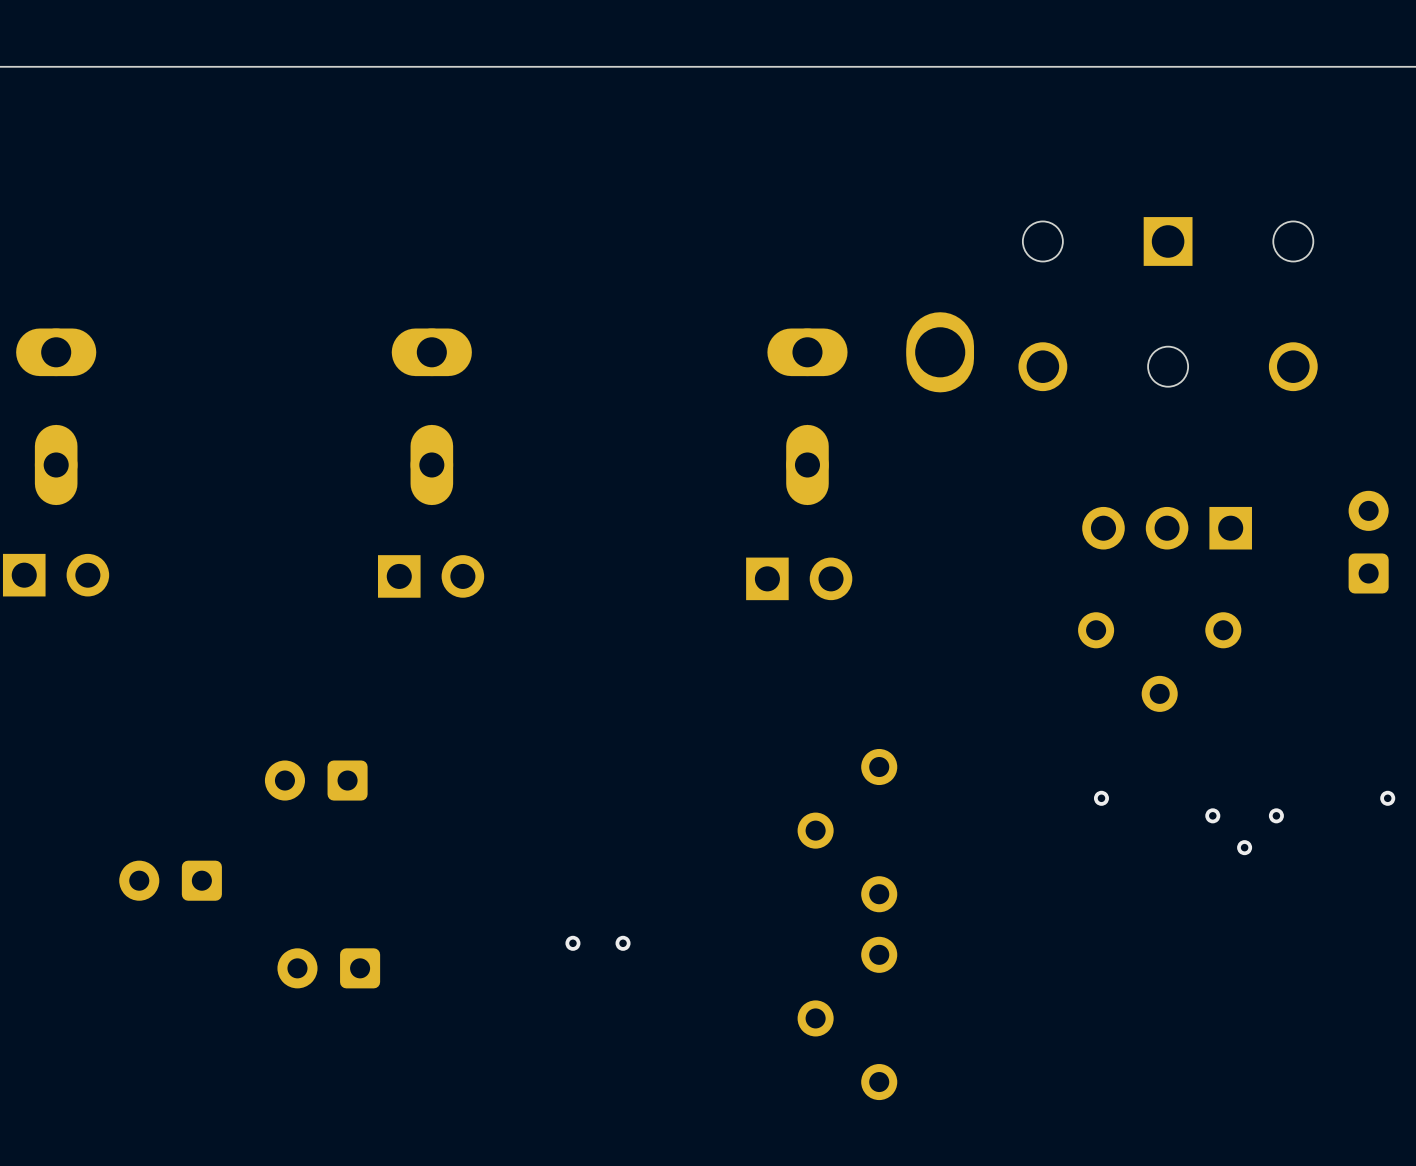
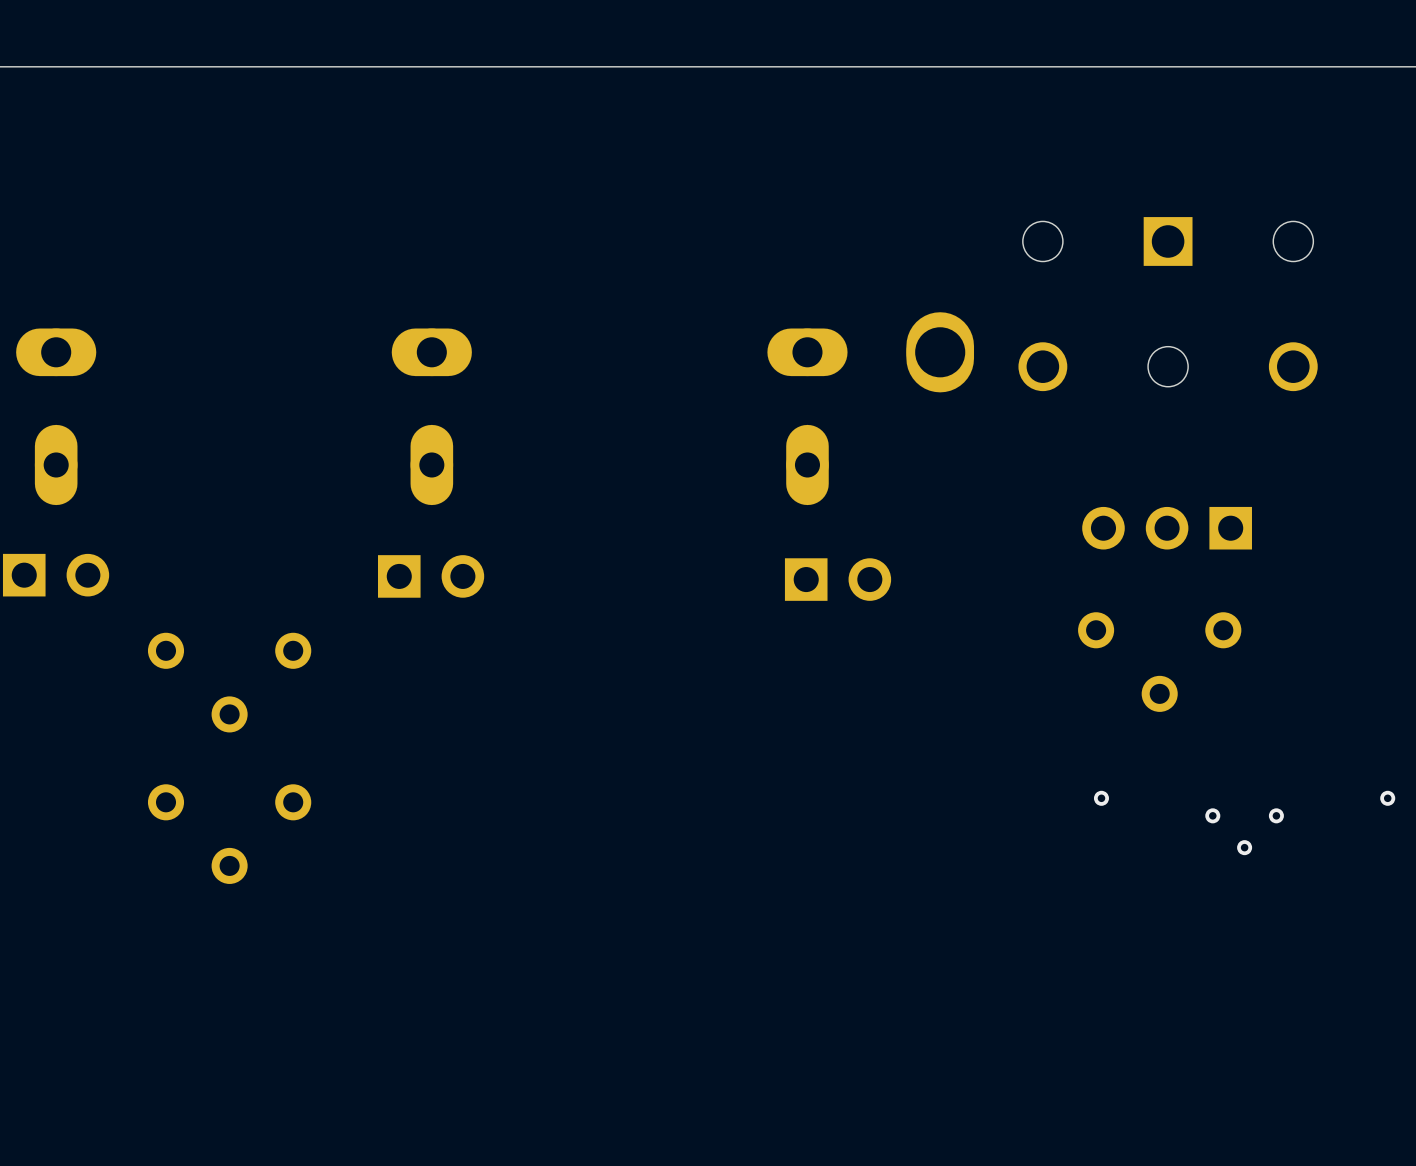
part: (1368, 542) -> none
part position: (799, 578) -> (838, 579)
part: none -> (229, 682)
part: (316, 780) -> none
part: (847, 830) -> none
part: none -> (229, 834)
part: (170, 880) -> none
via: (572, 943) -> none
via: (623, 943) -> none
part: (328, 968) -> none
part: (847, 1018) -> none

